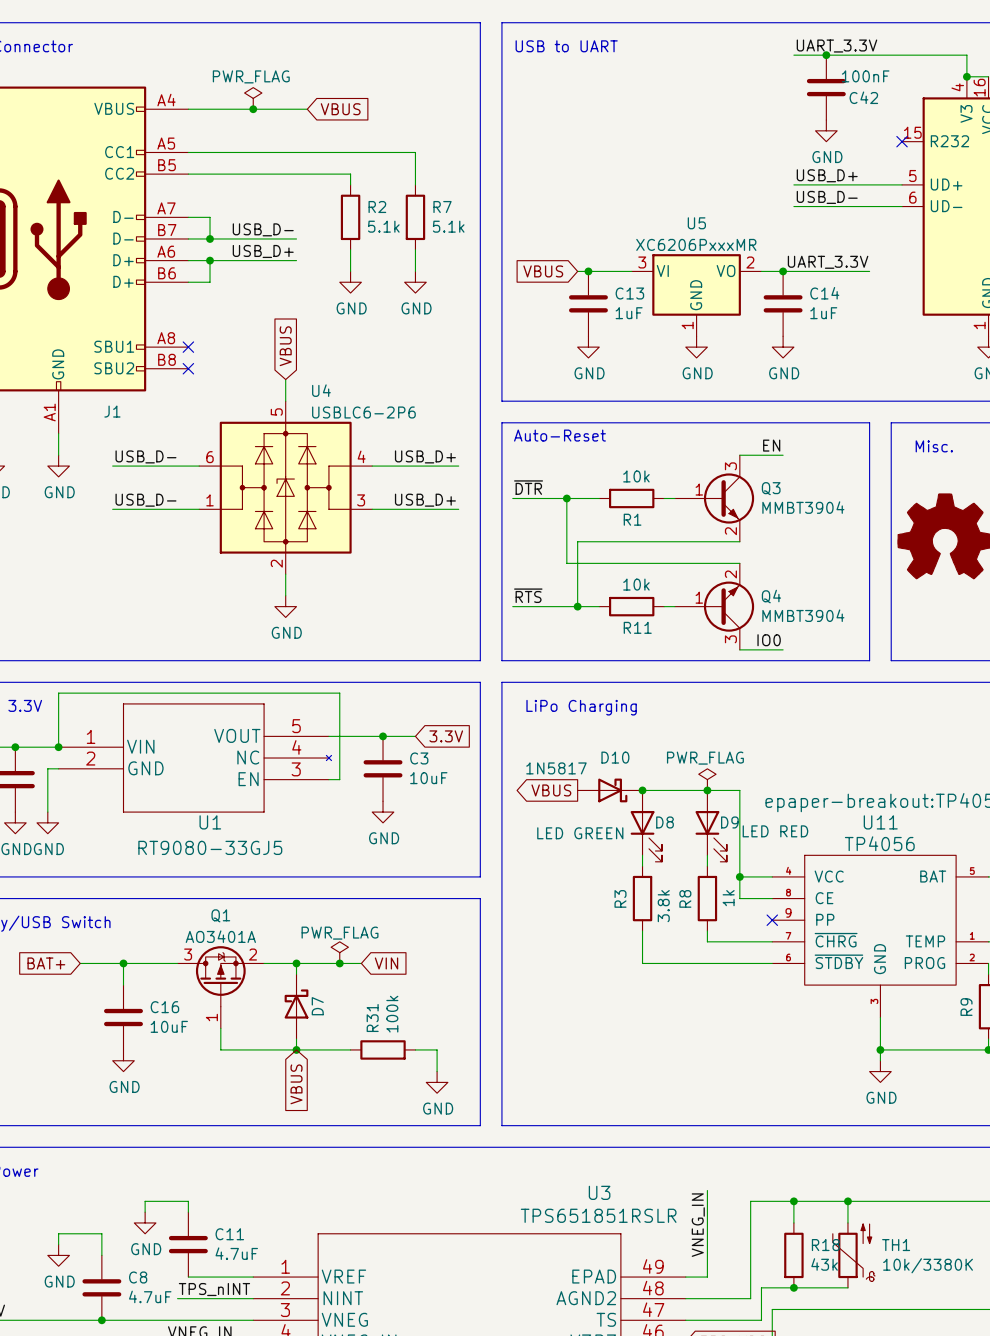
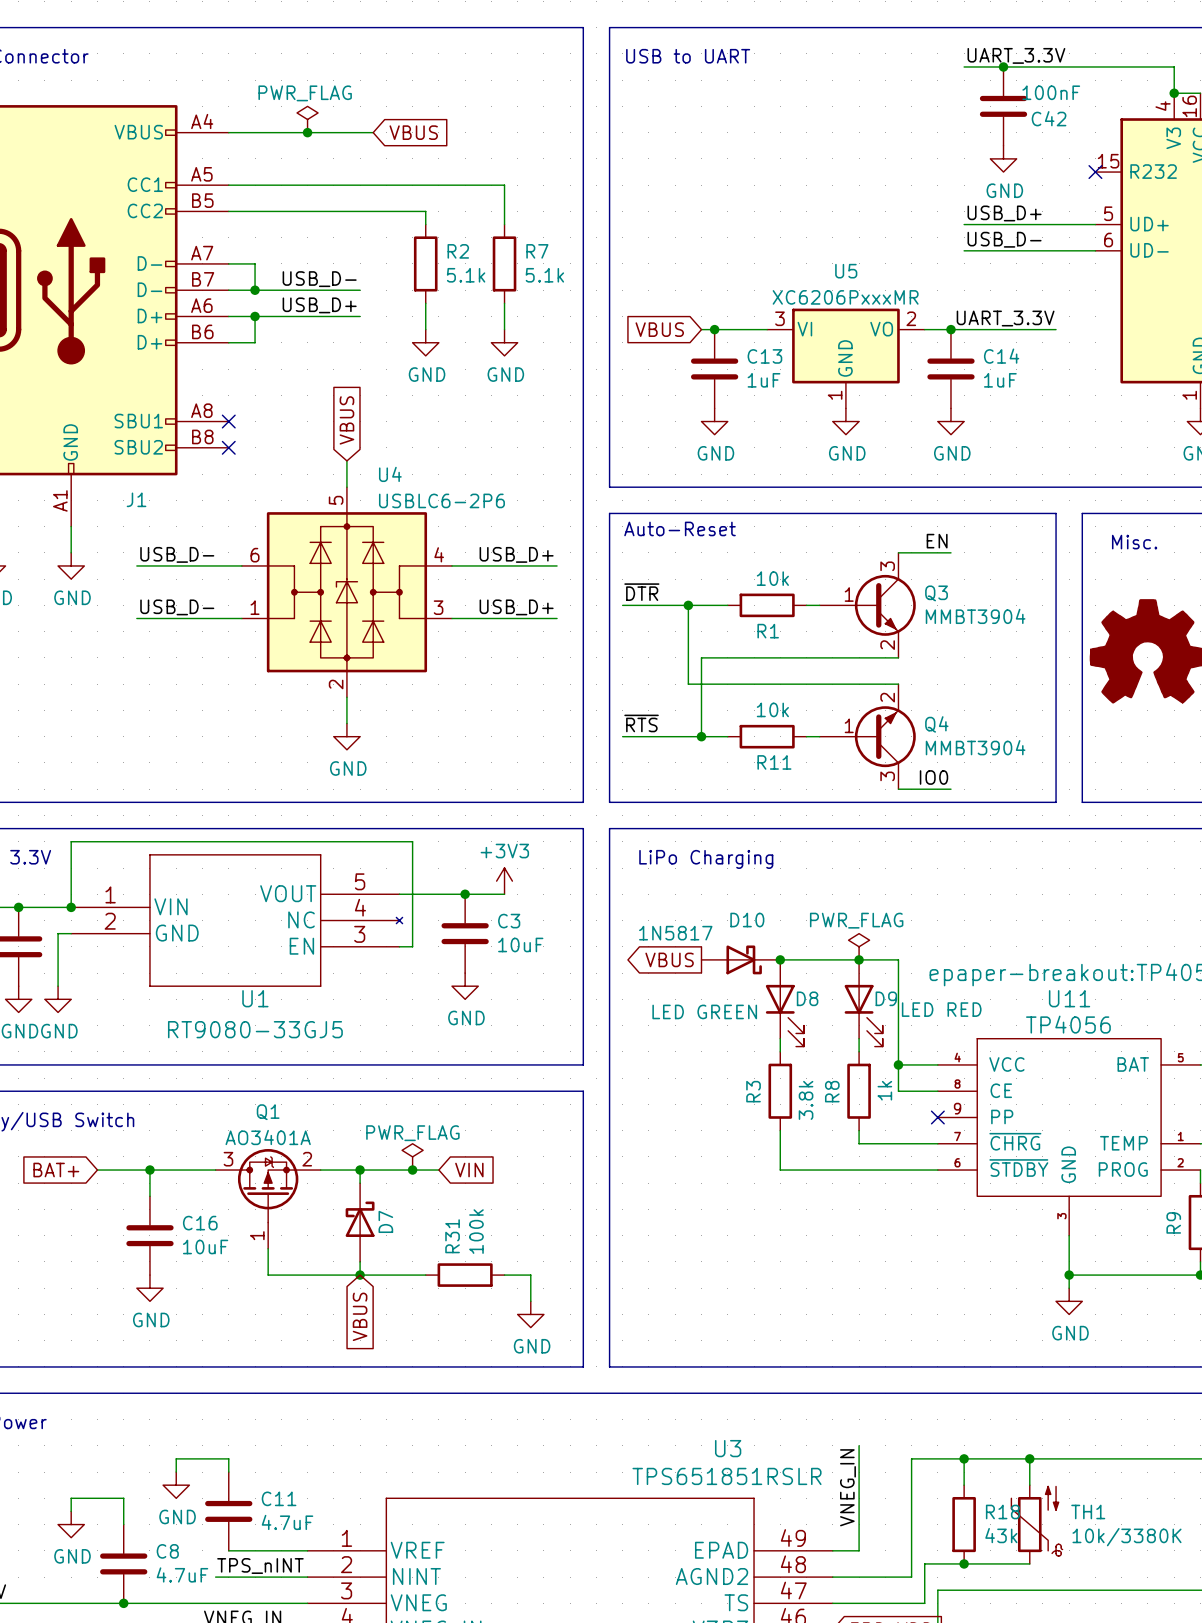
power symbol: none -> +3V3 (504, 881)
global label: 3.3V (446, 736) -> none

